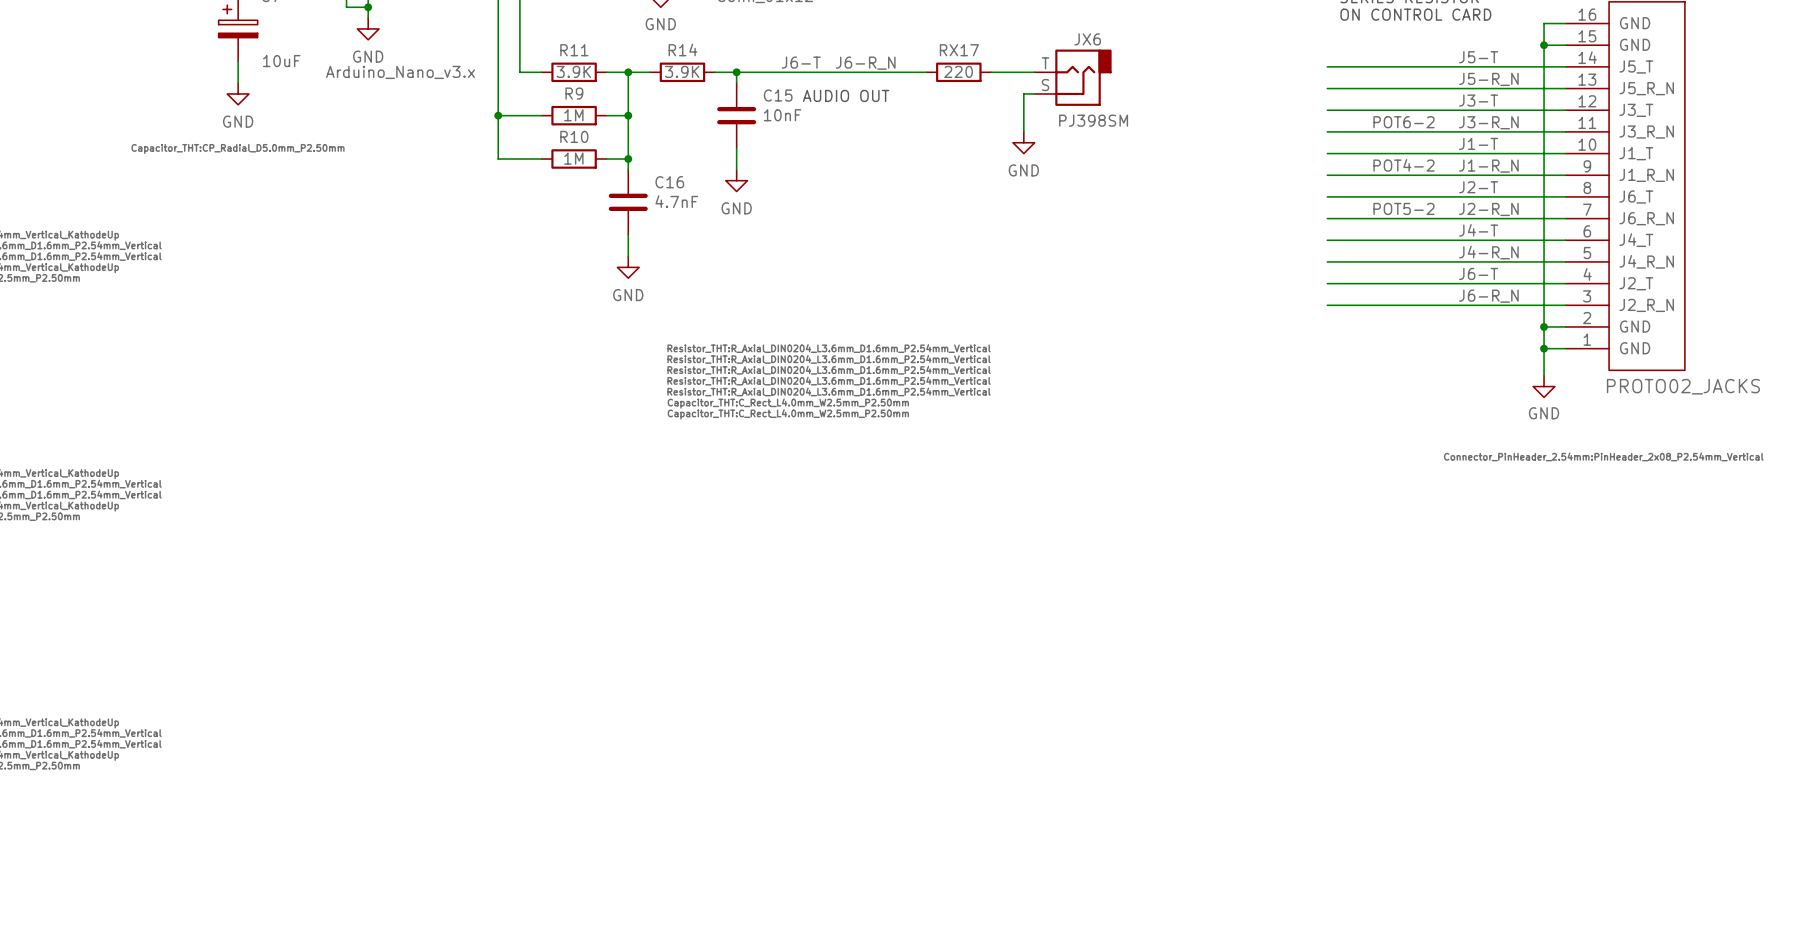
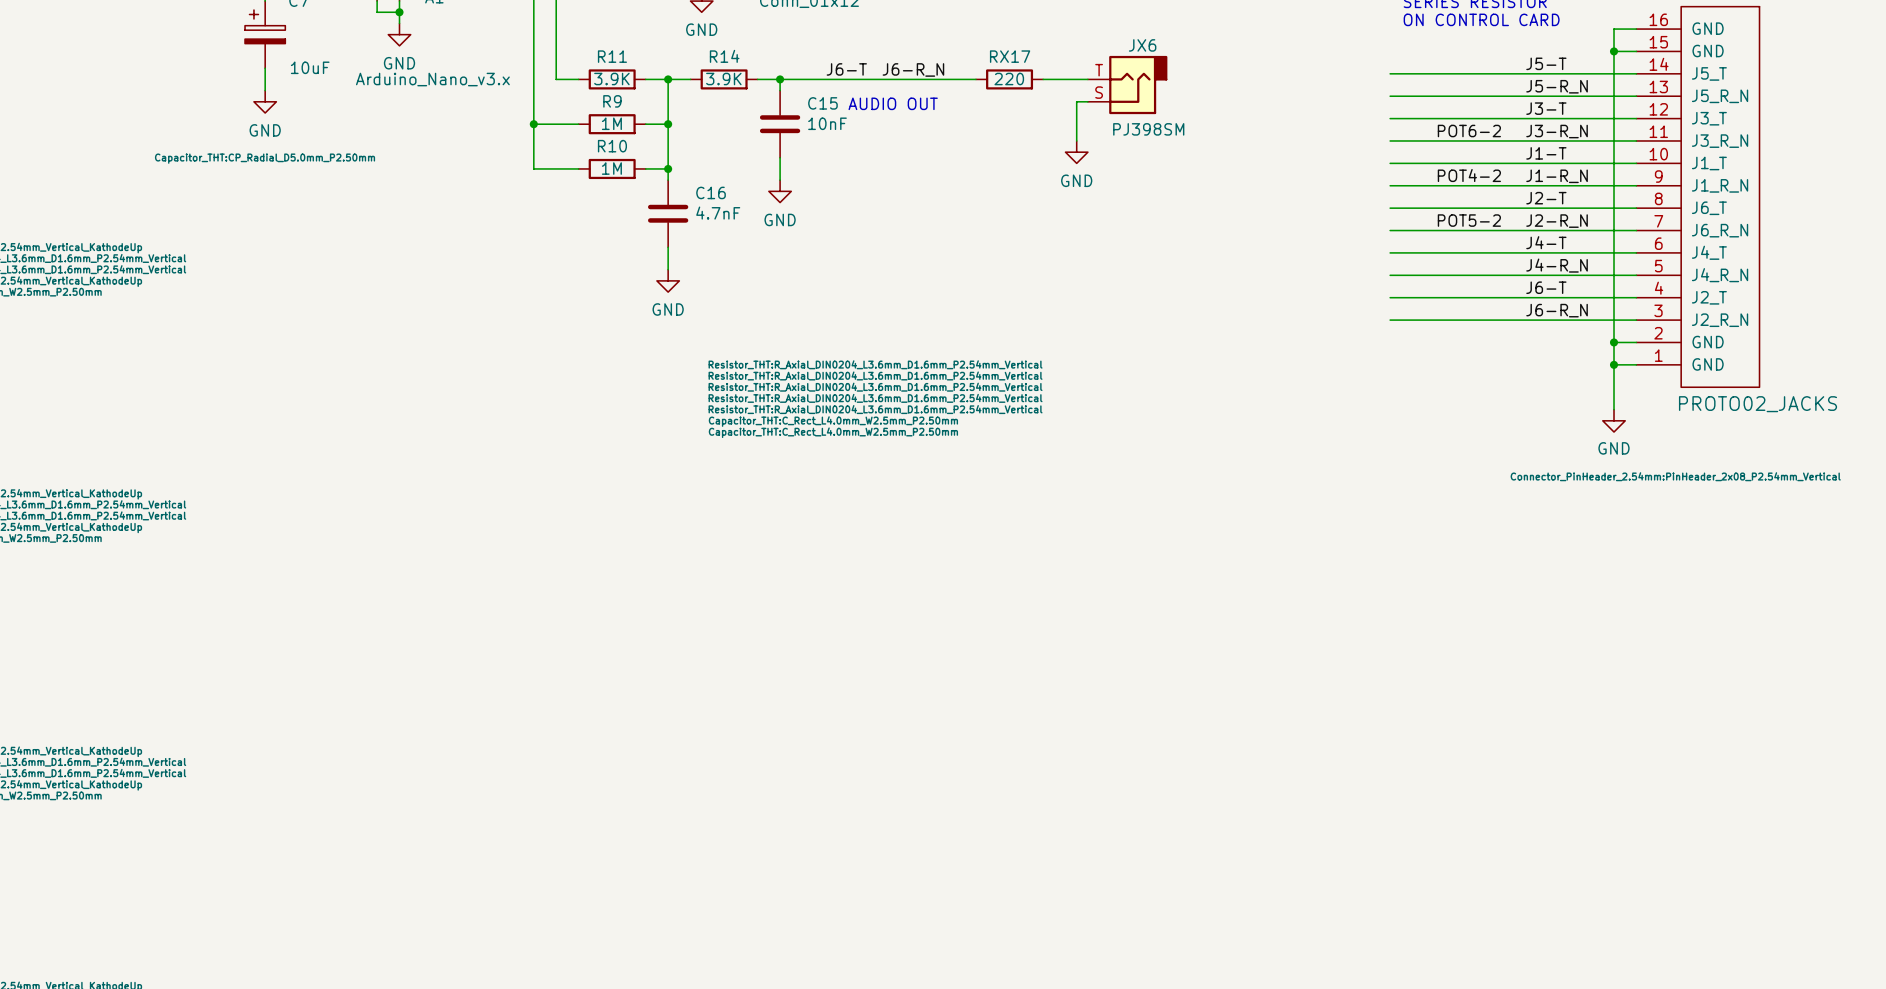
power symbol position: GND (1544, 386) -> GND (1614, 420)

